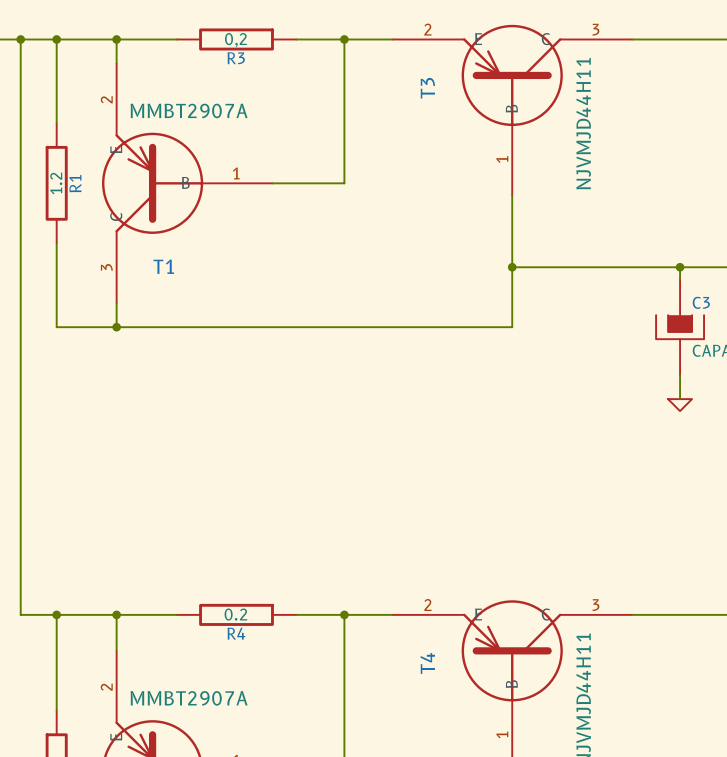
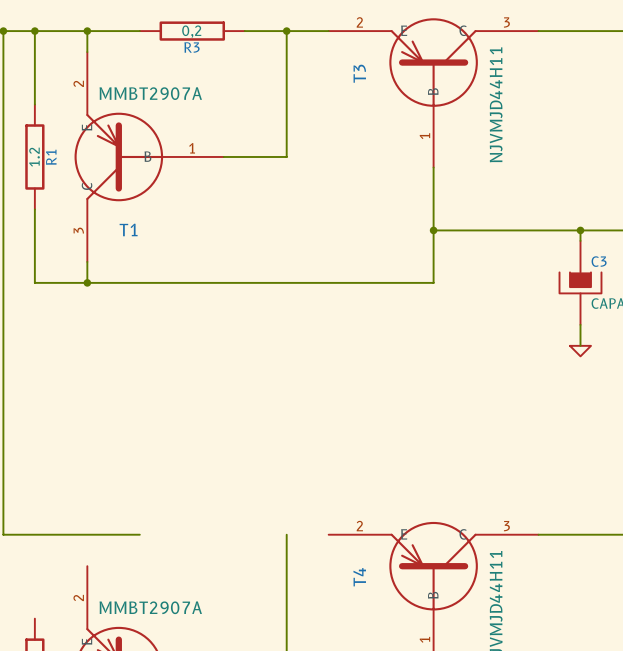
wire: (56, 614) (56, 710) -> none
junction: (56, 614) -> none
wire: (116, 614) (116, 650) -> none
junction: (116, 614) -> none
R4: 0.2 (236, 614) -> none
wire: (296, 614) (392, 614) -> none
junction: (344, 614) -> none

